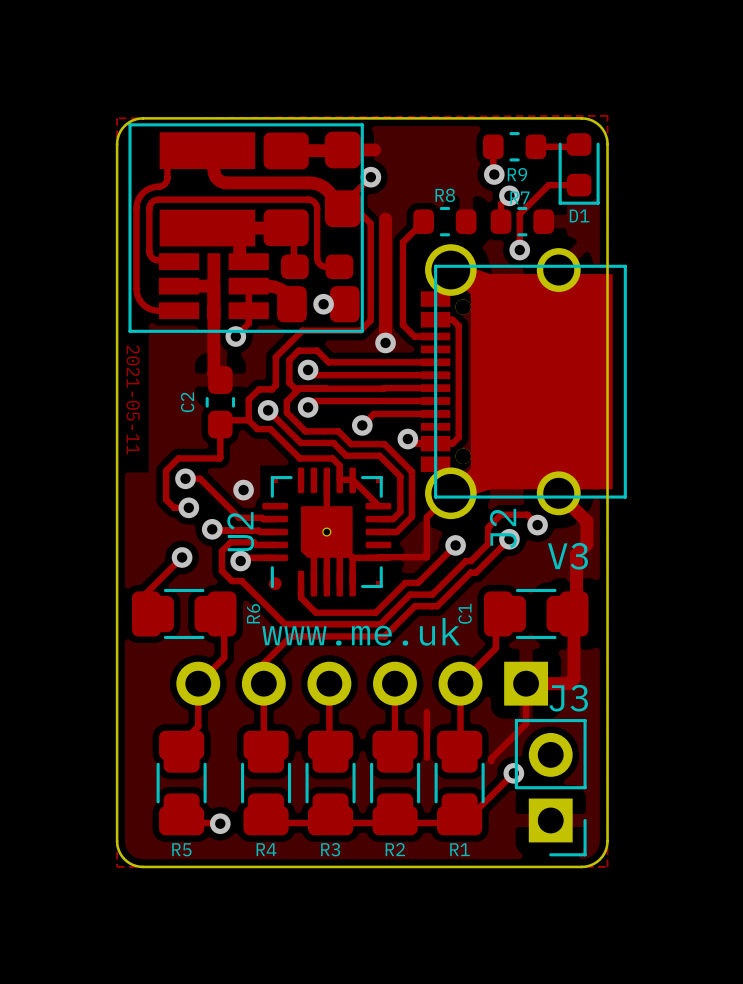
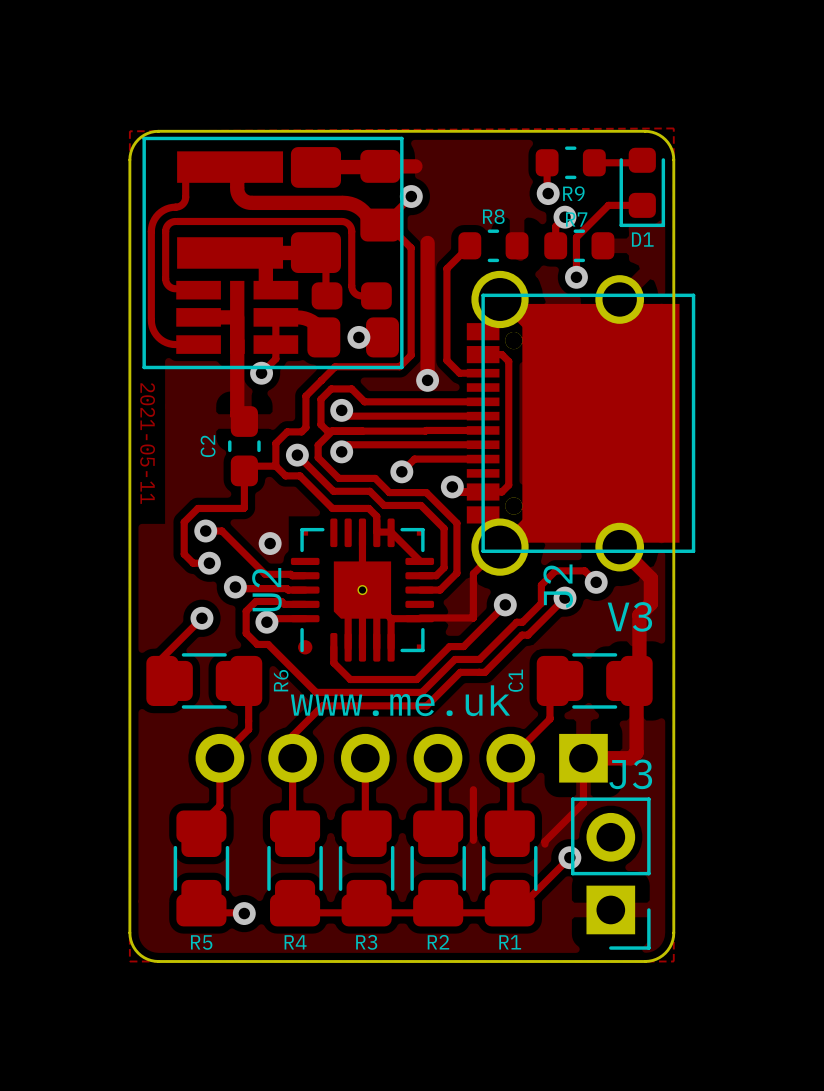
part footprint: [128, 123, 364, 333] -> [142, 136, 404, 370]
J2 footprint: [420, 244, 627, 520] -> [466, 270, 696, 576]

